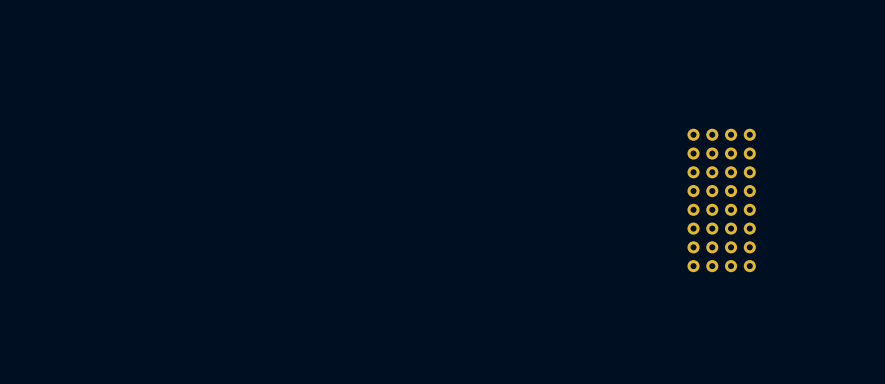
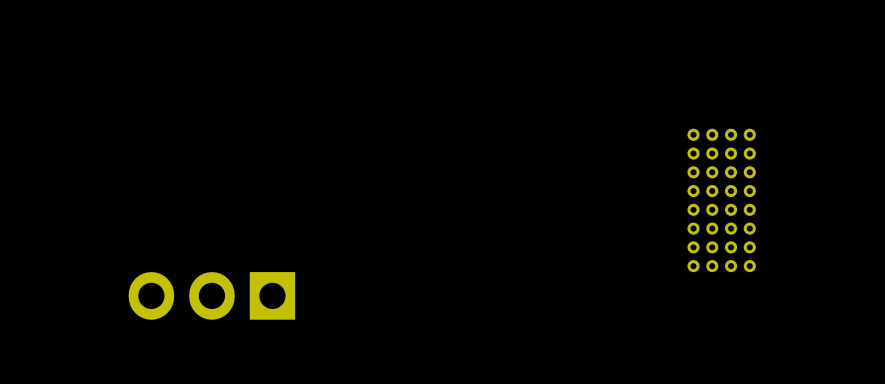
part: none -> (211, 295)

